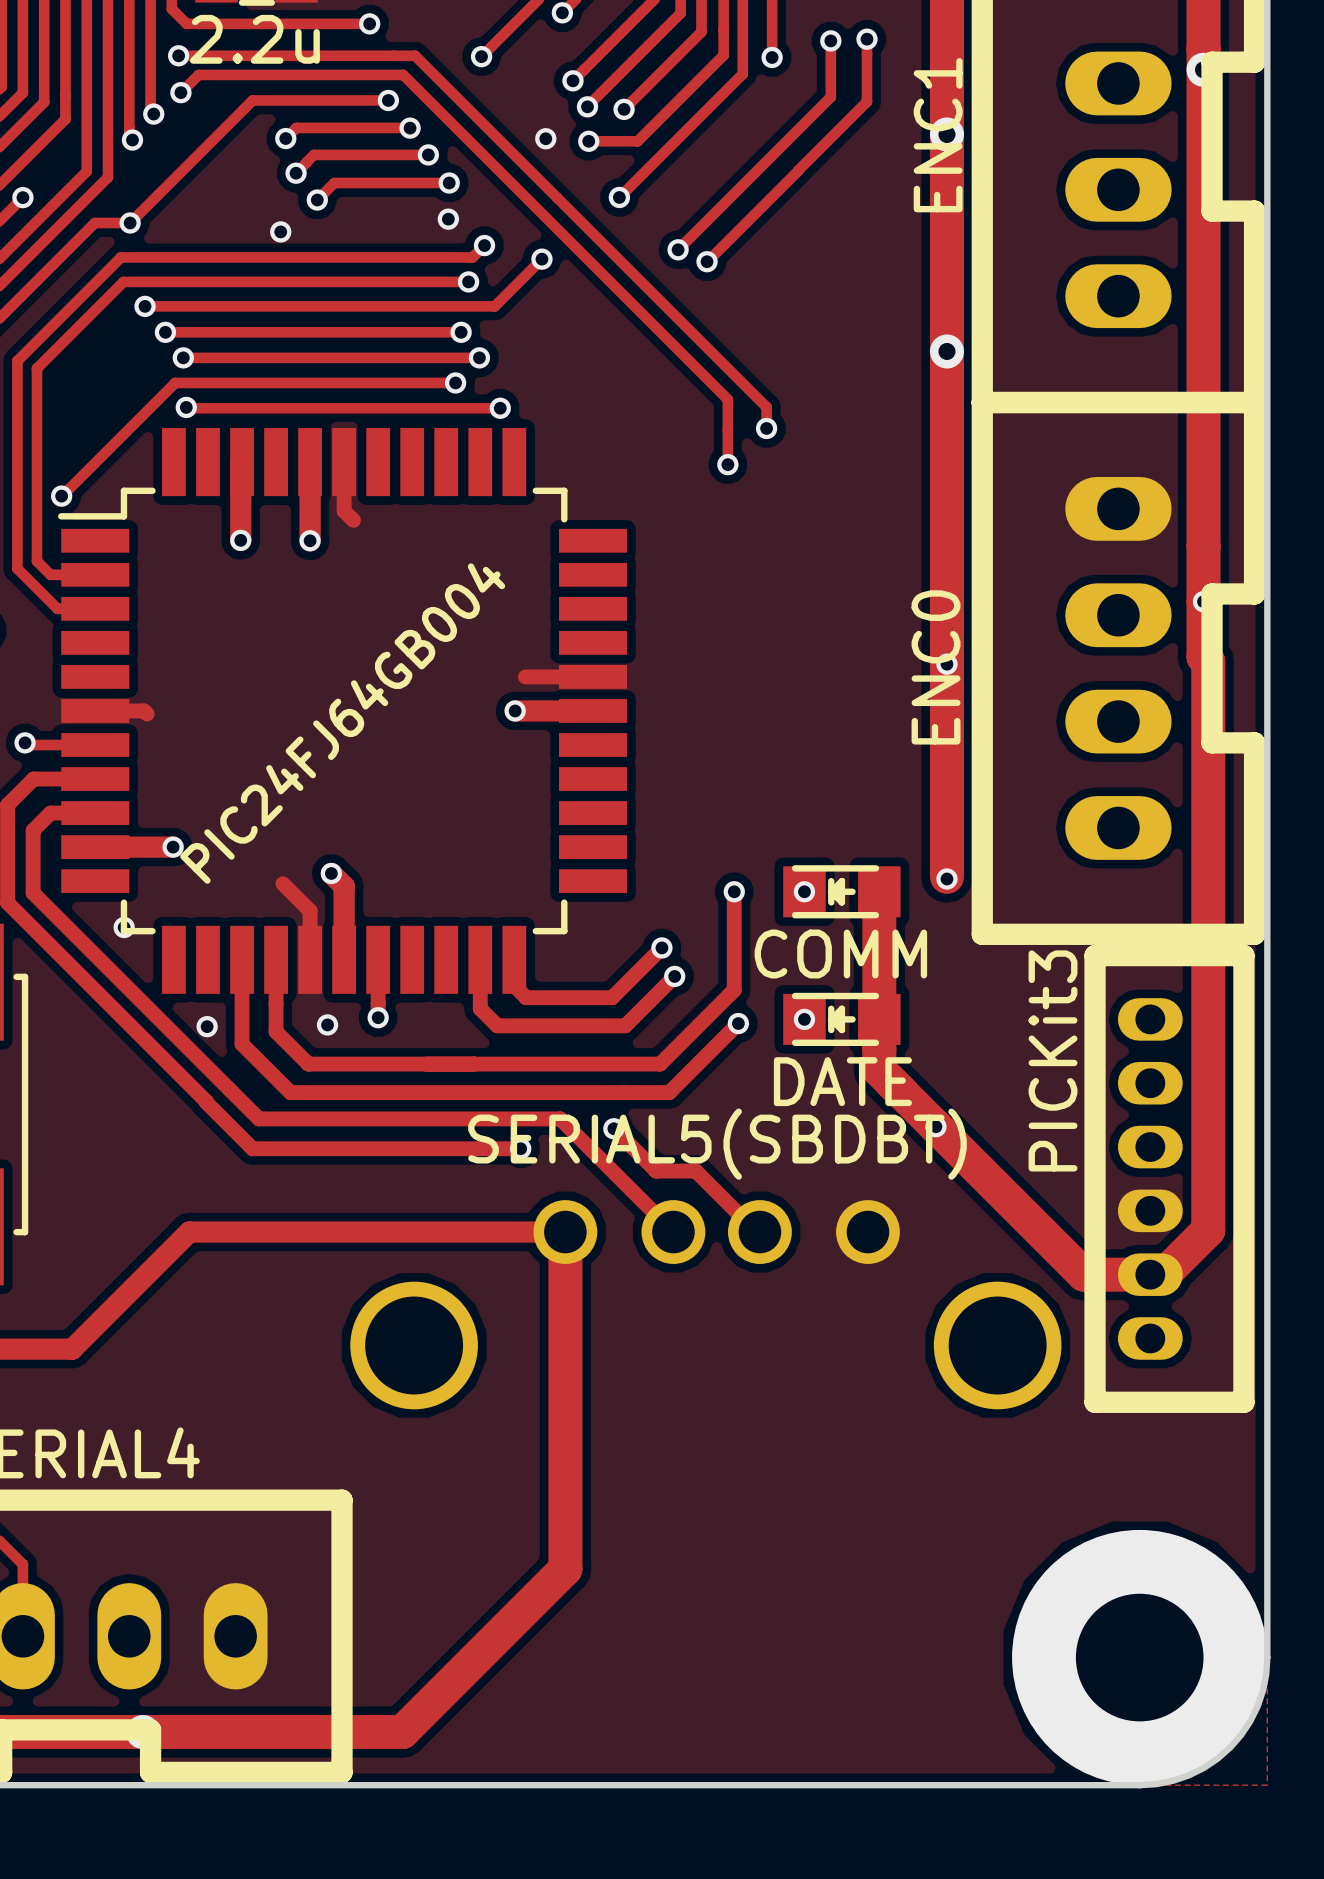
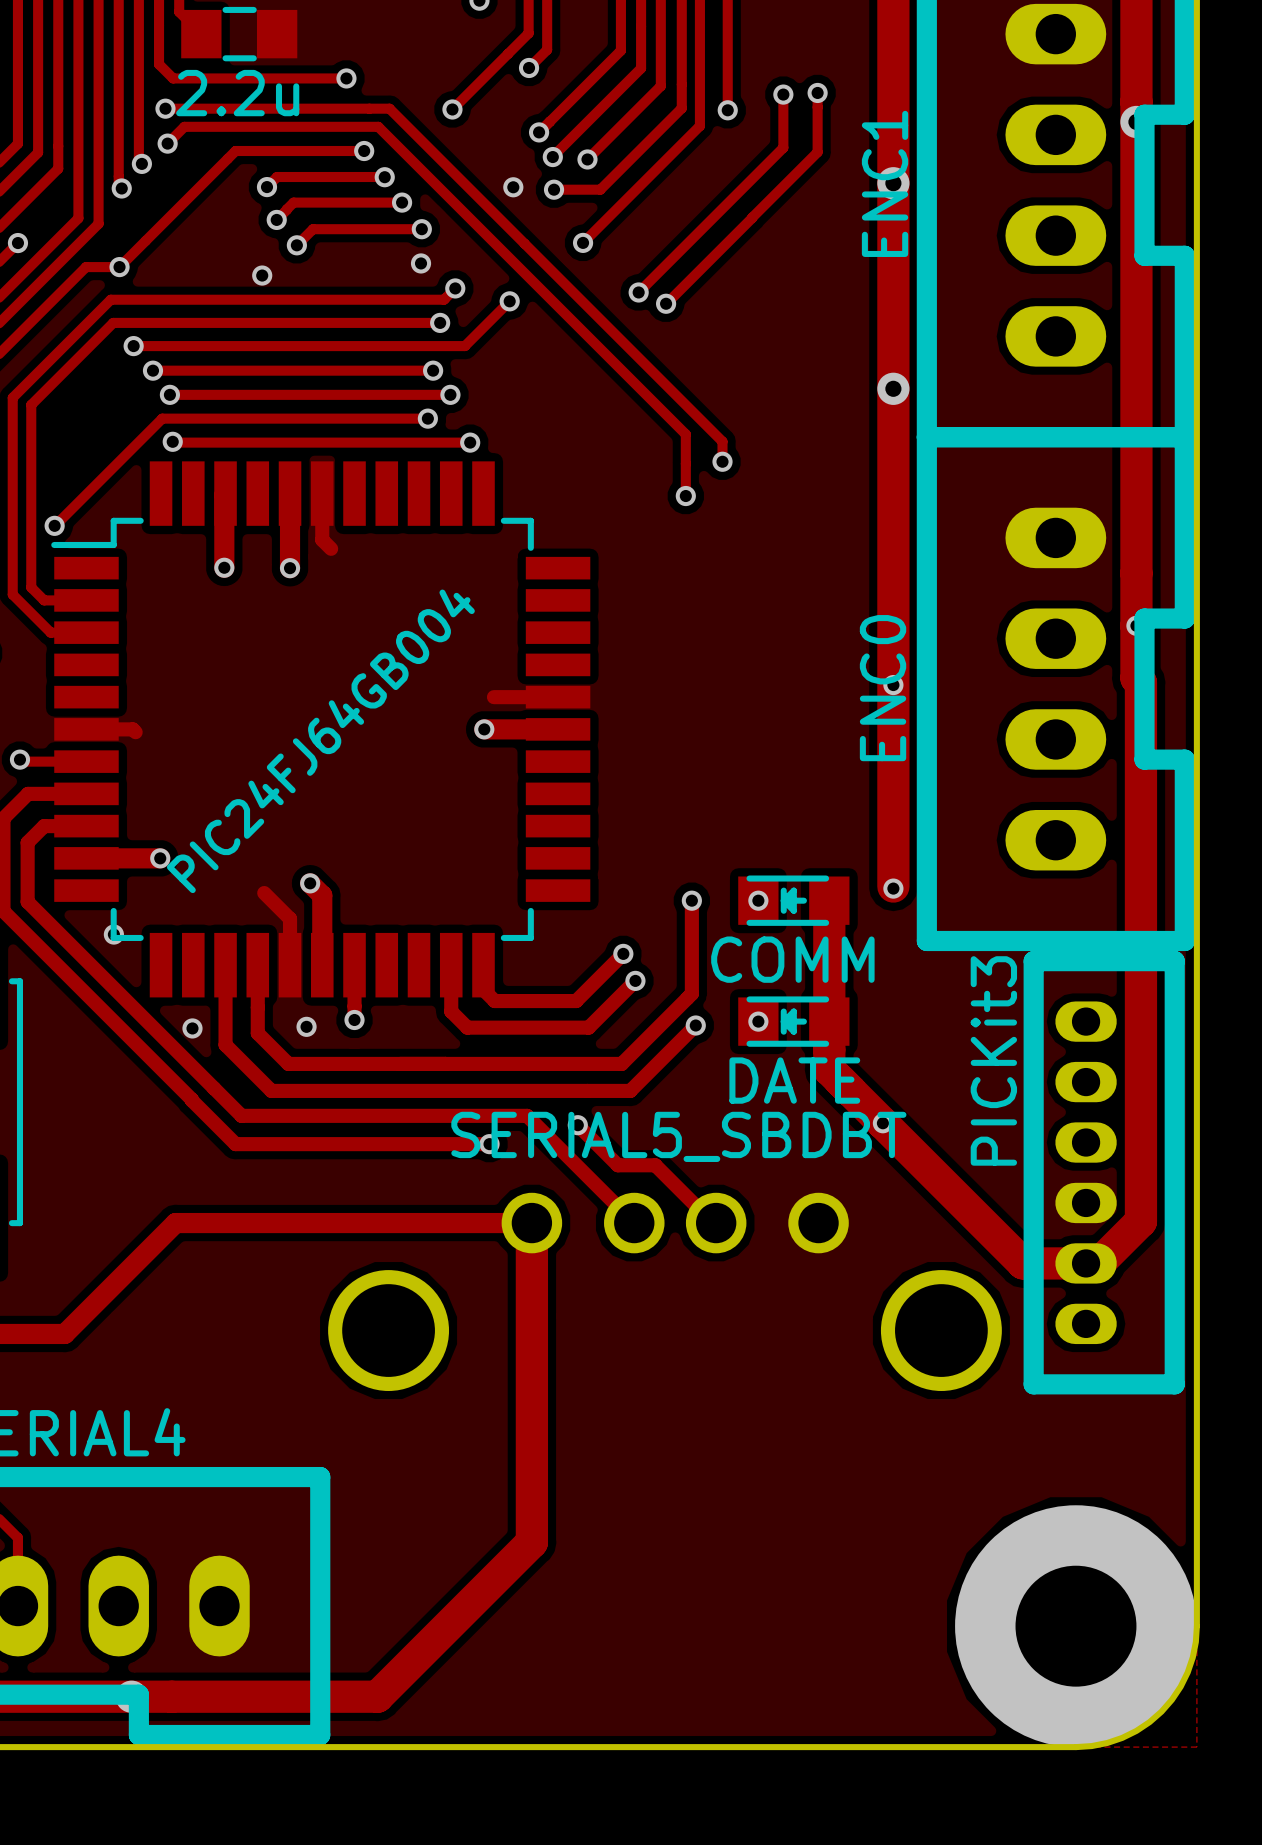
part value: SERIAL5(SBDBT) (717, 1144) -> SERIAL5_SBDBT (678, 1136)

